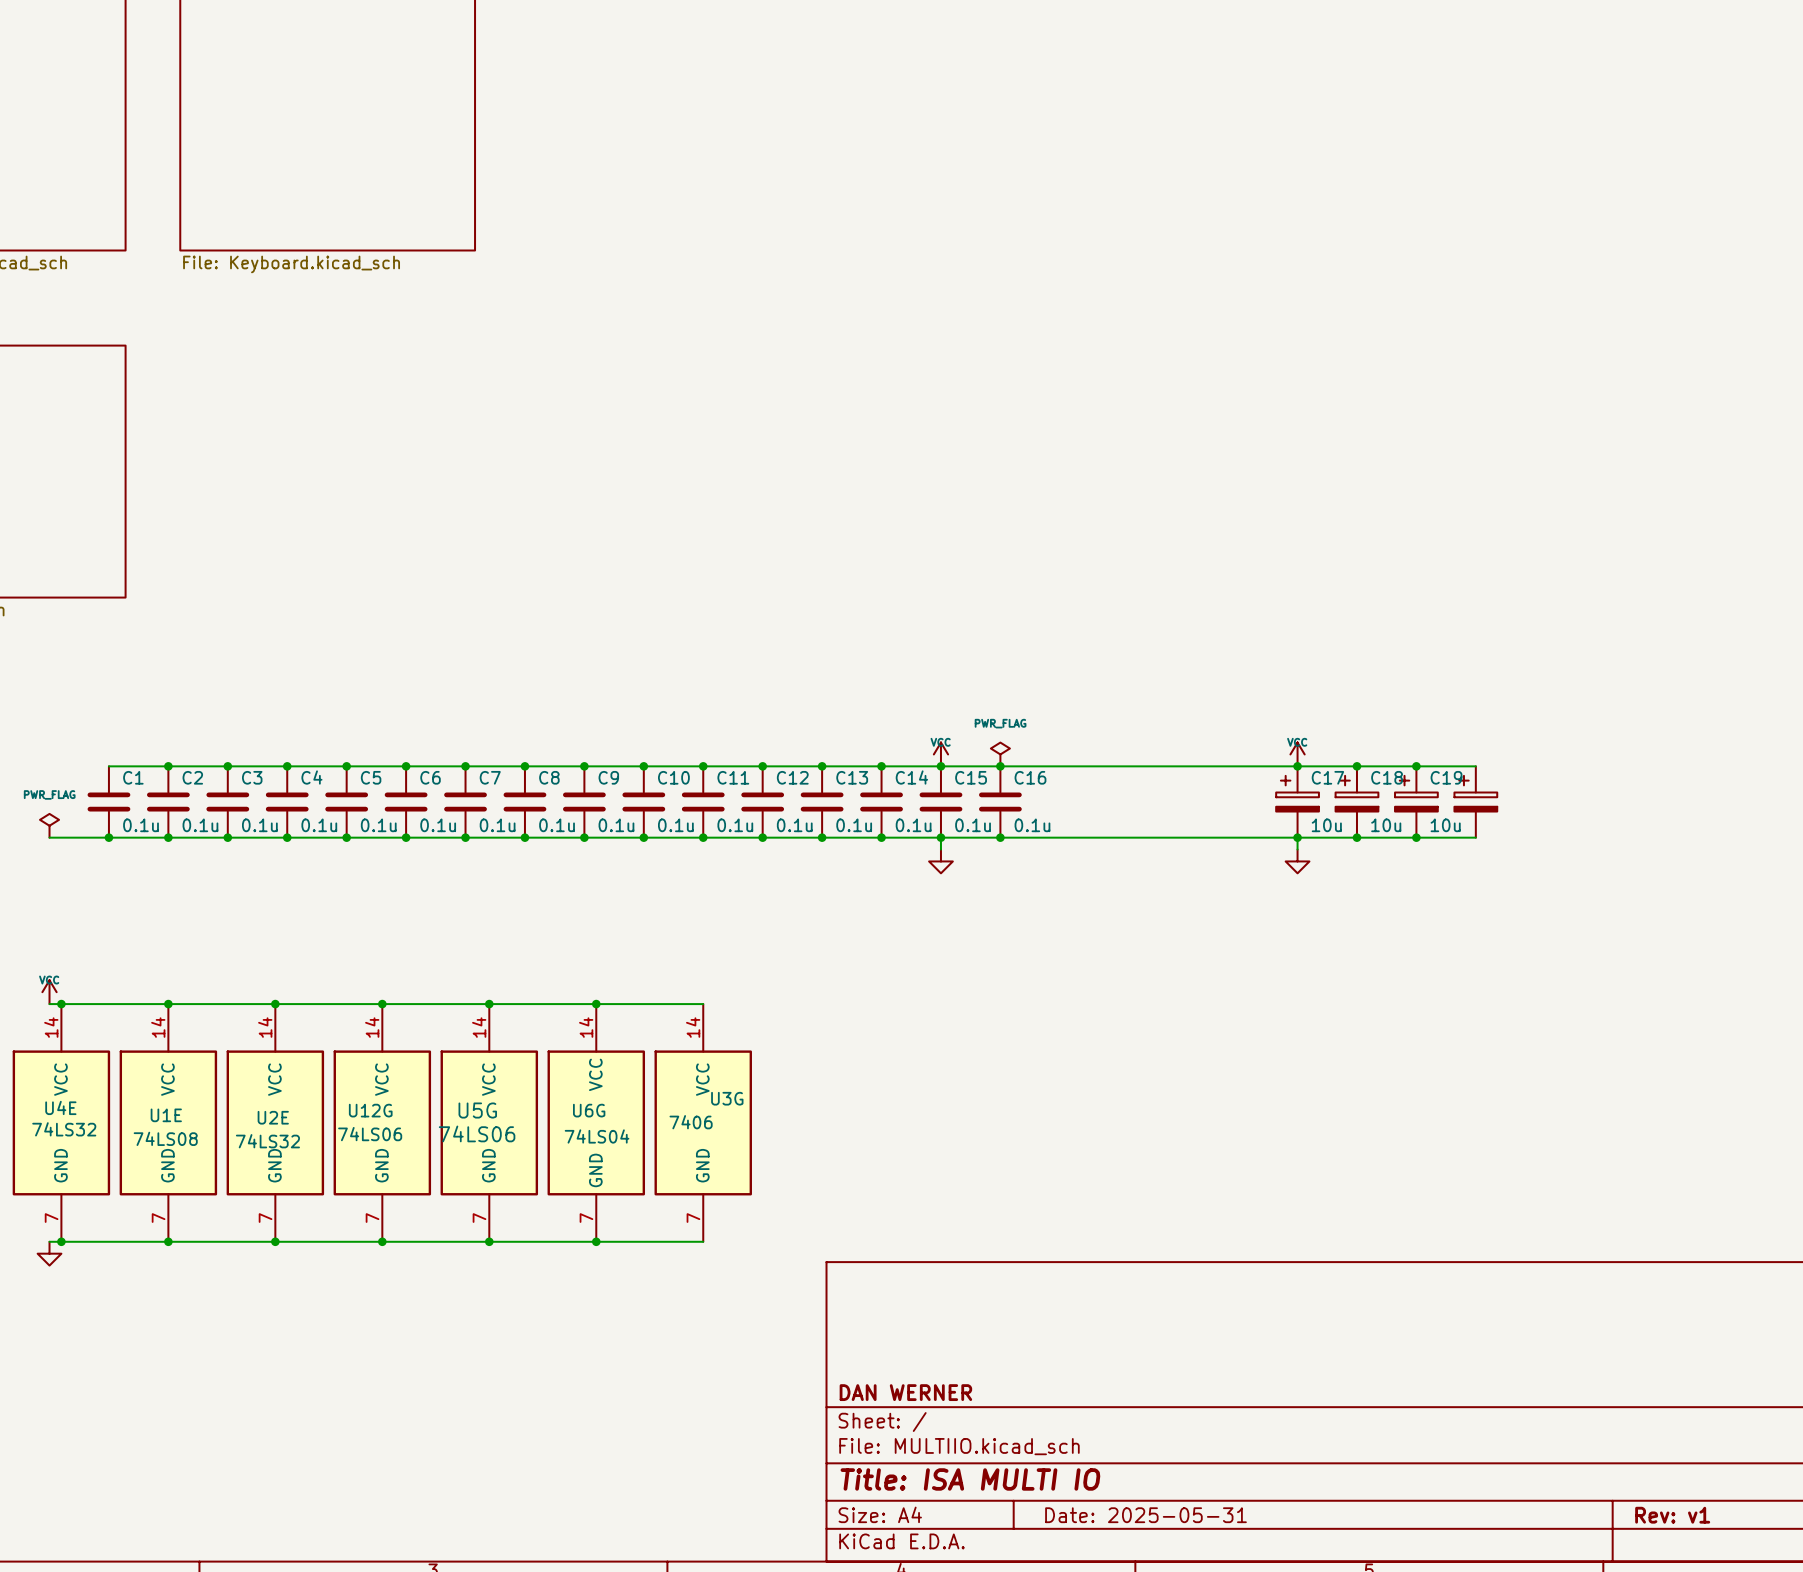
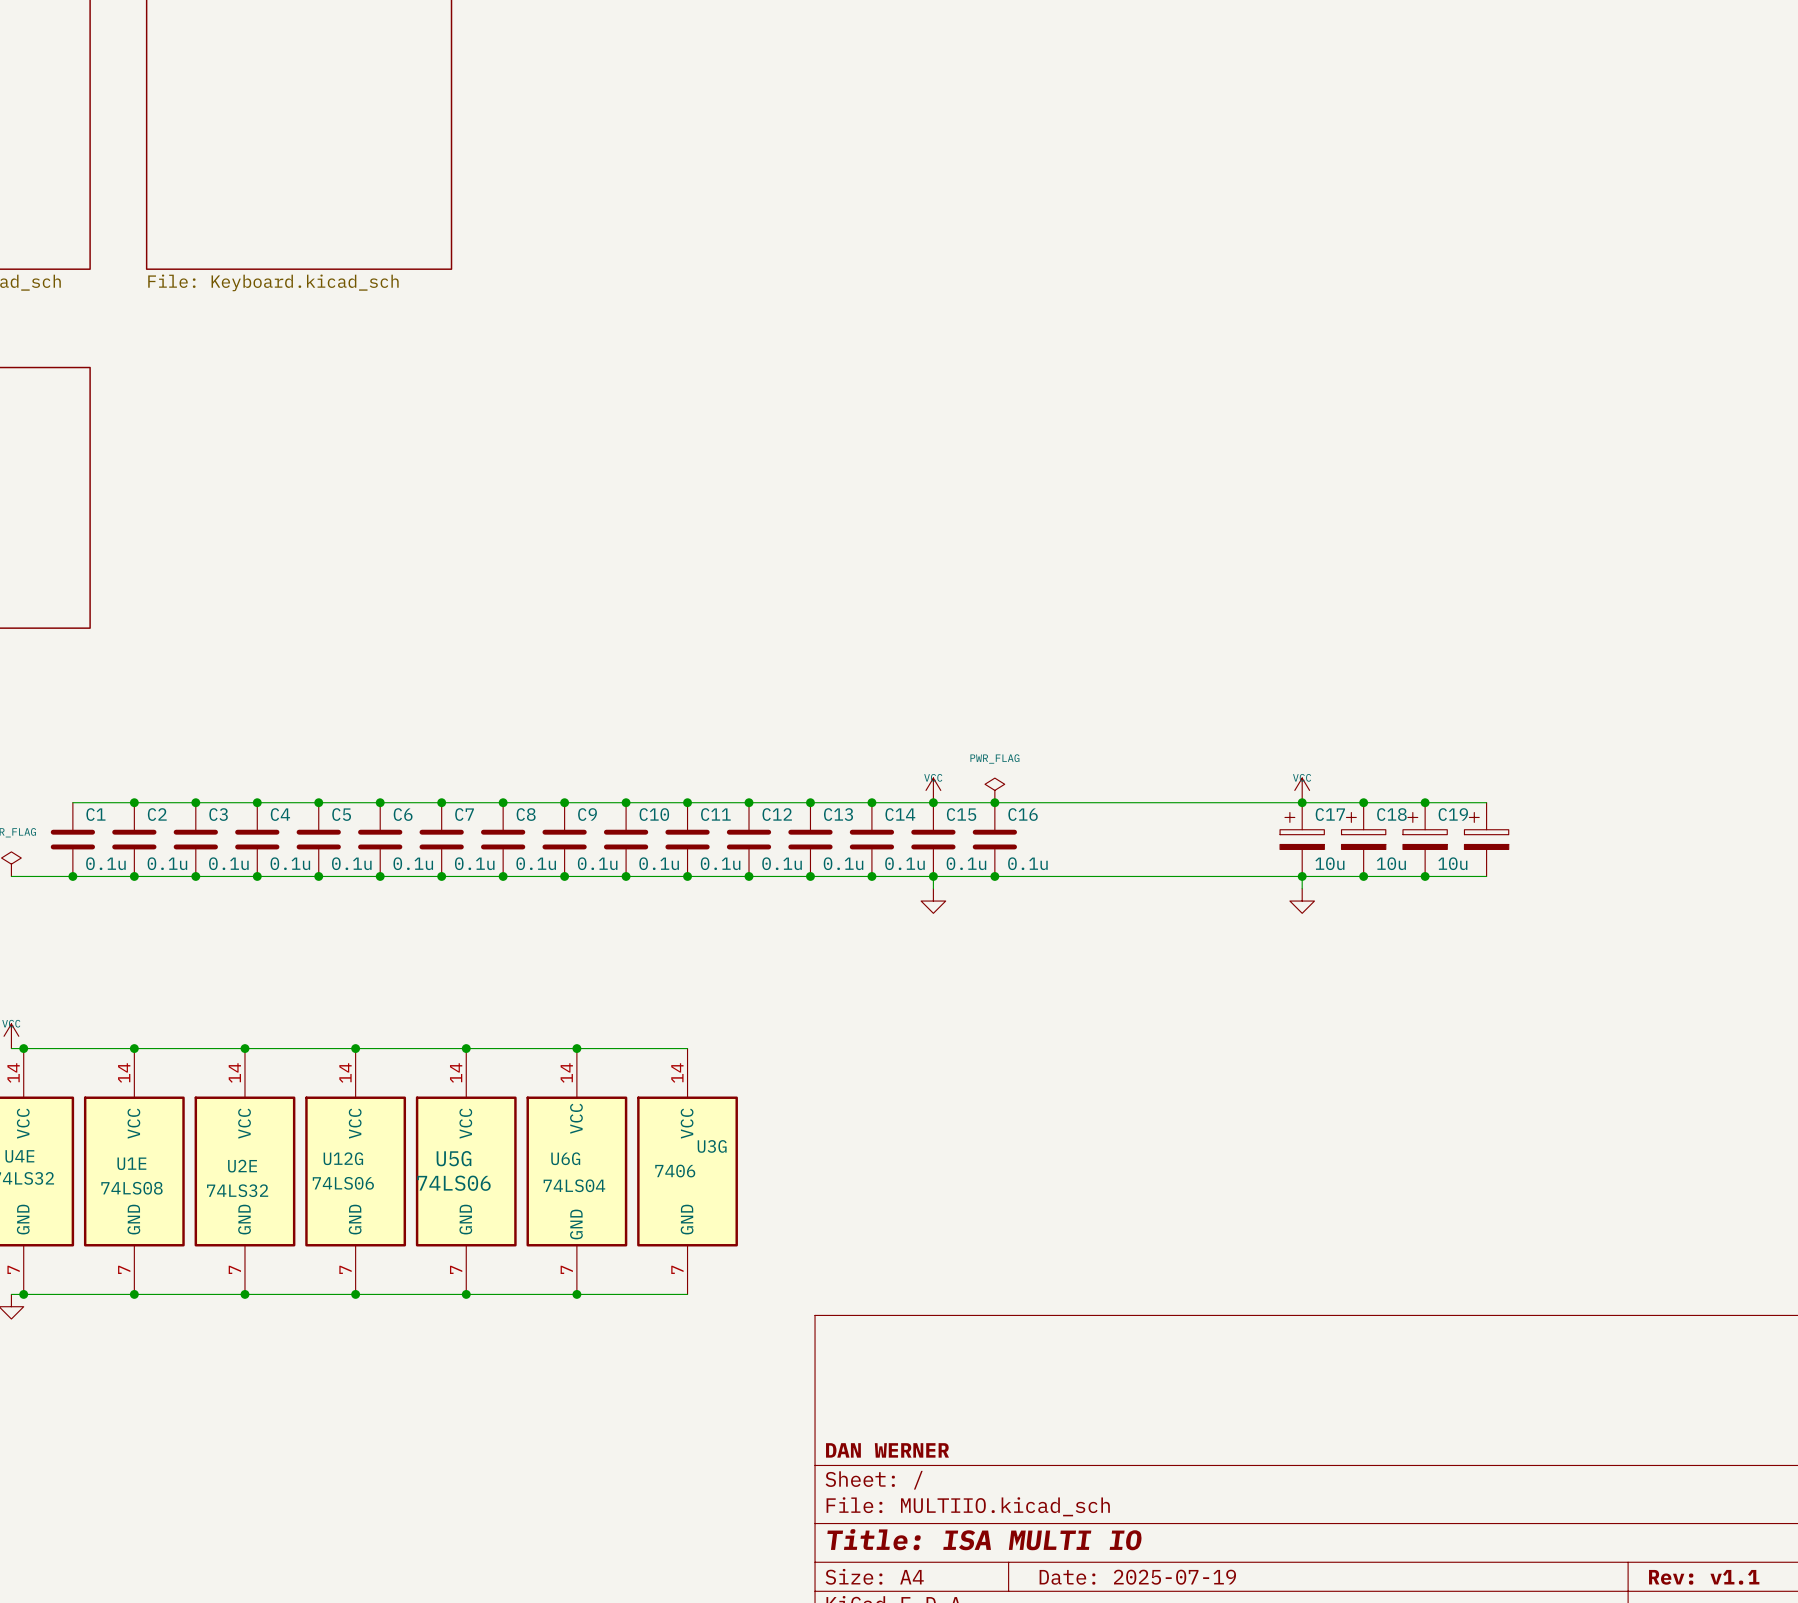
title block: Date: 2025-05-31 (1145, 1515) -> Date: 2025-07-19 (1137, 1577)
title block: Rev: v1 (1672, 1515) -> Rev: v1.1 (1704, 1577)

